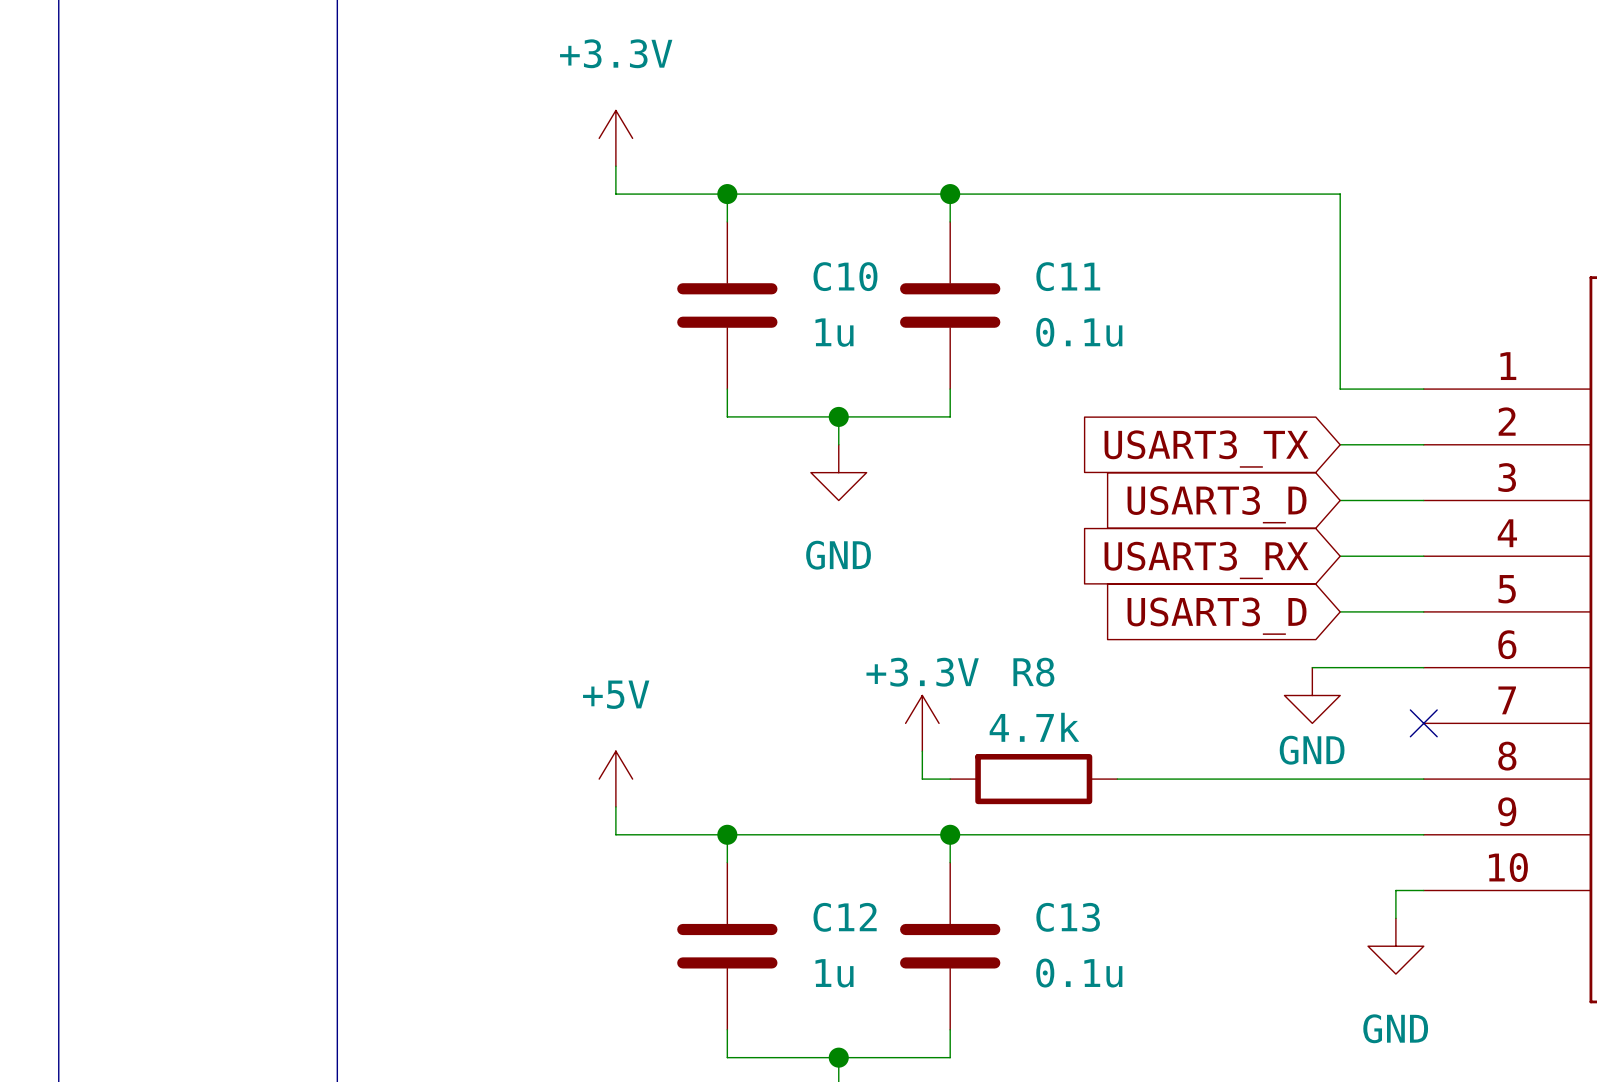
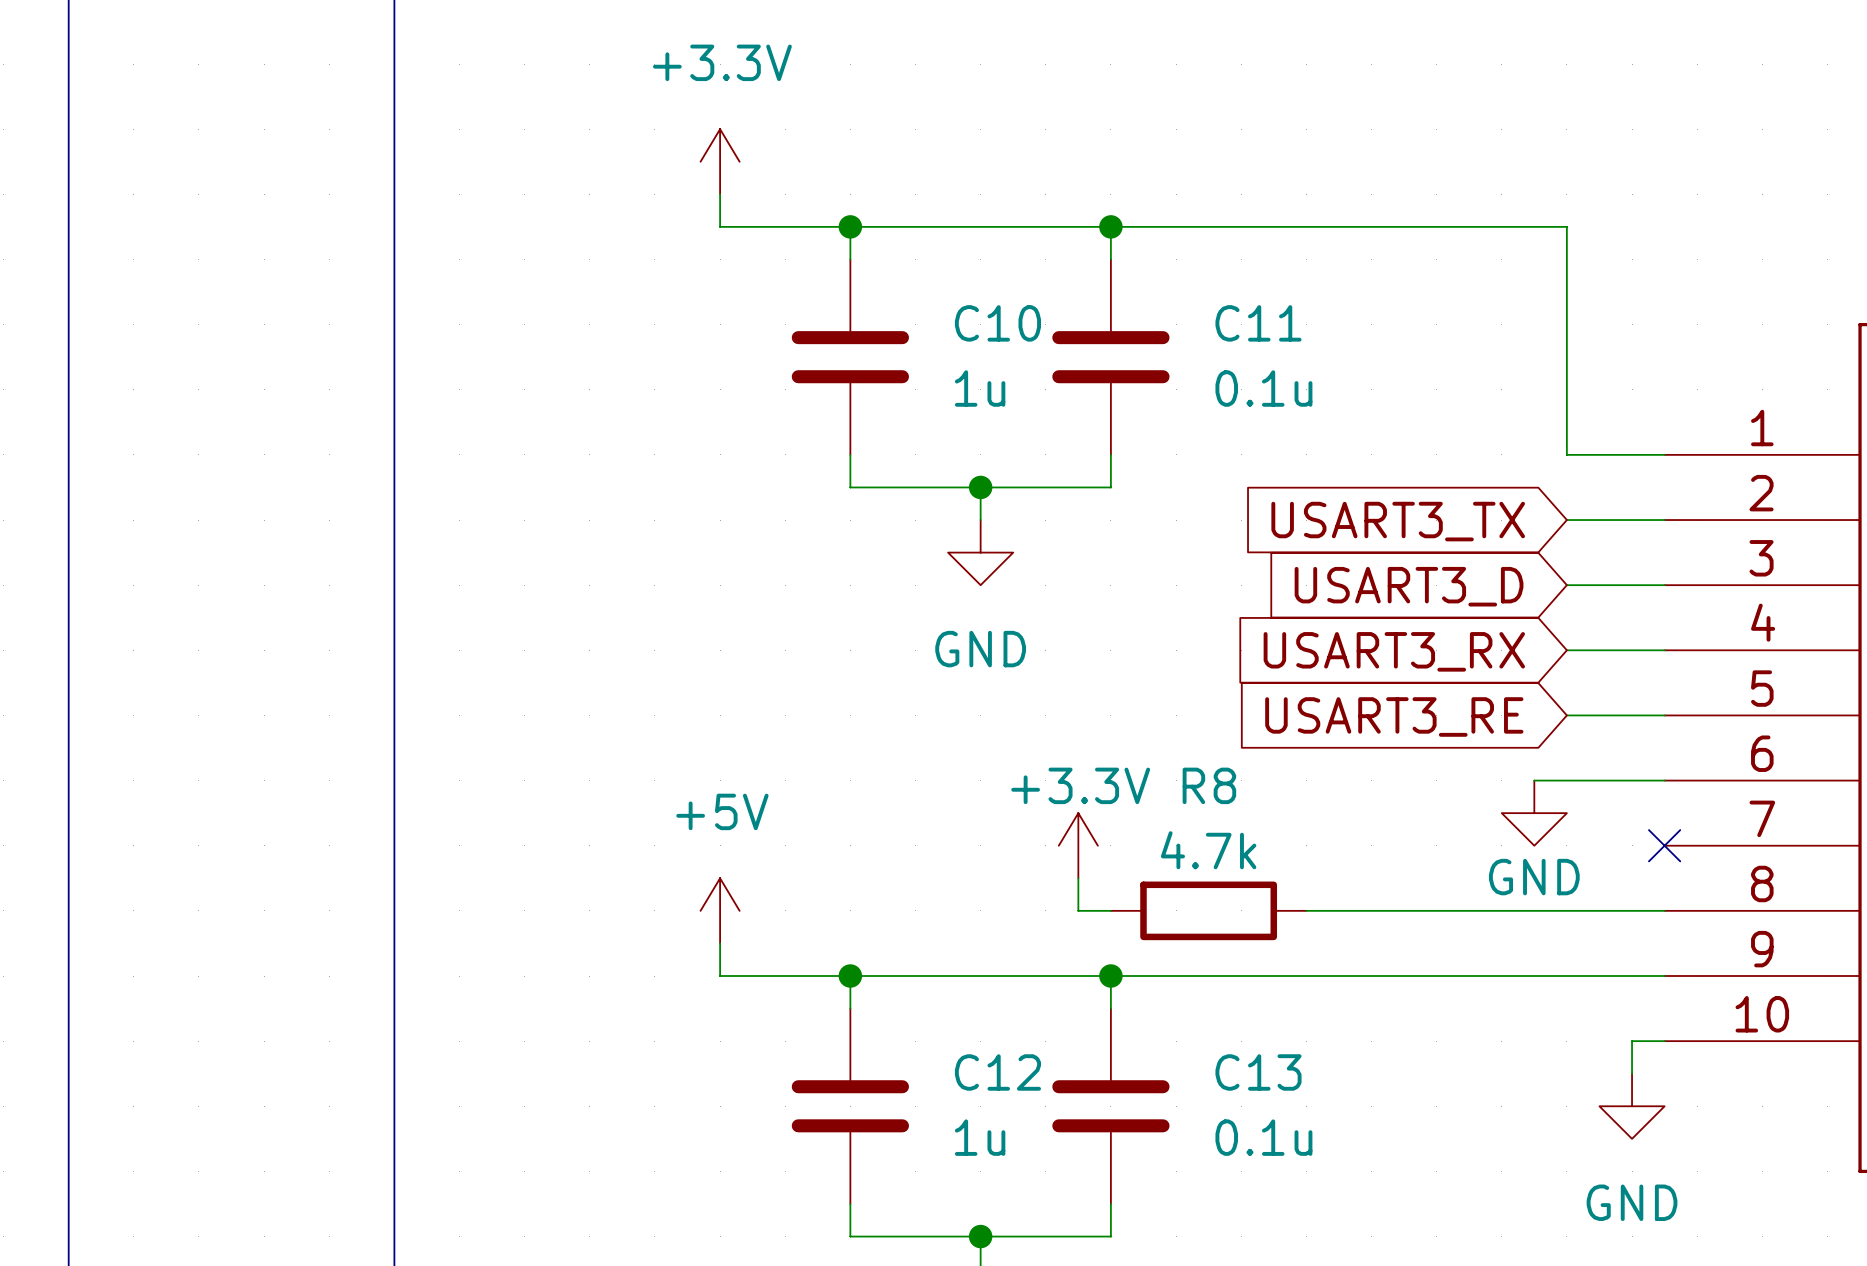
global label: USART3_D (1217, 616) -> USART3_RE (1394, 716)

